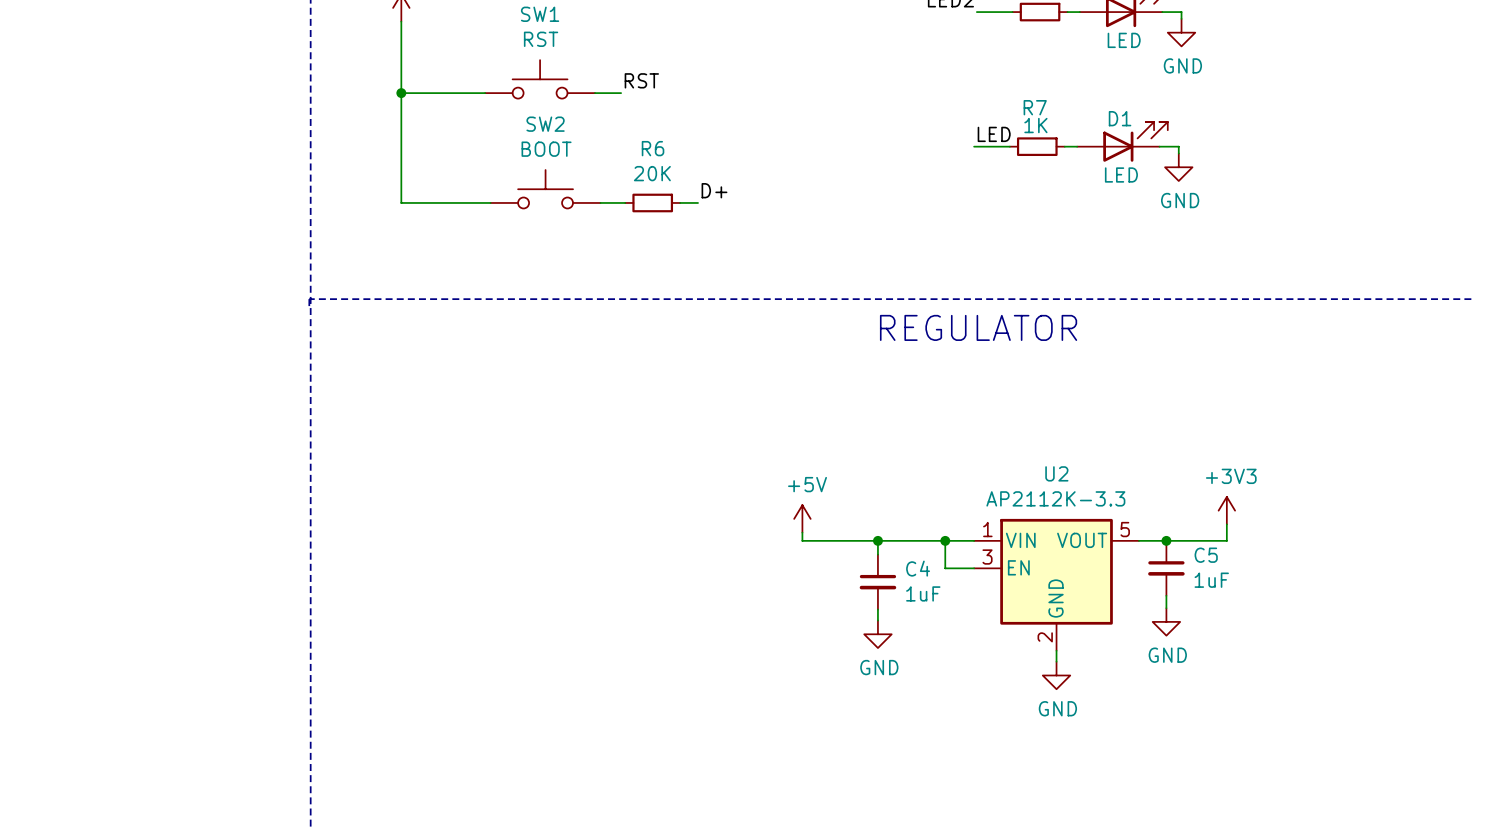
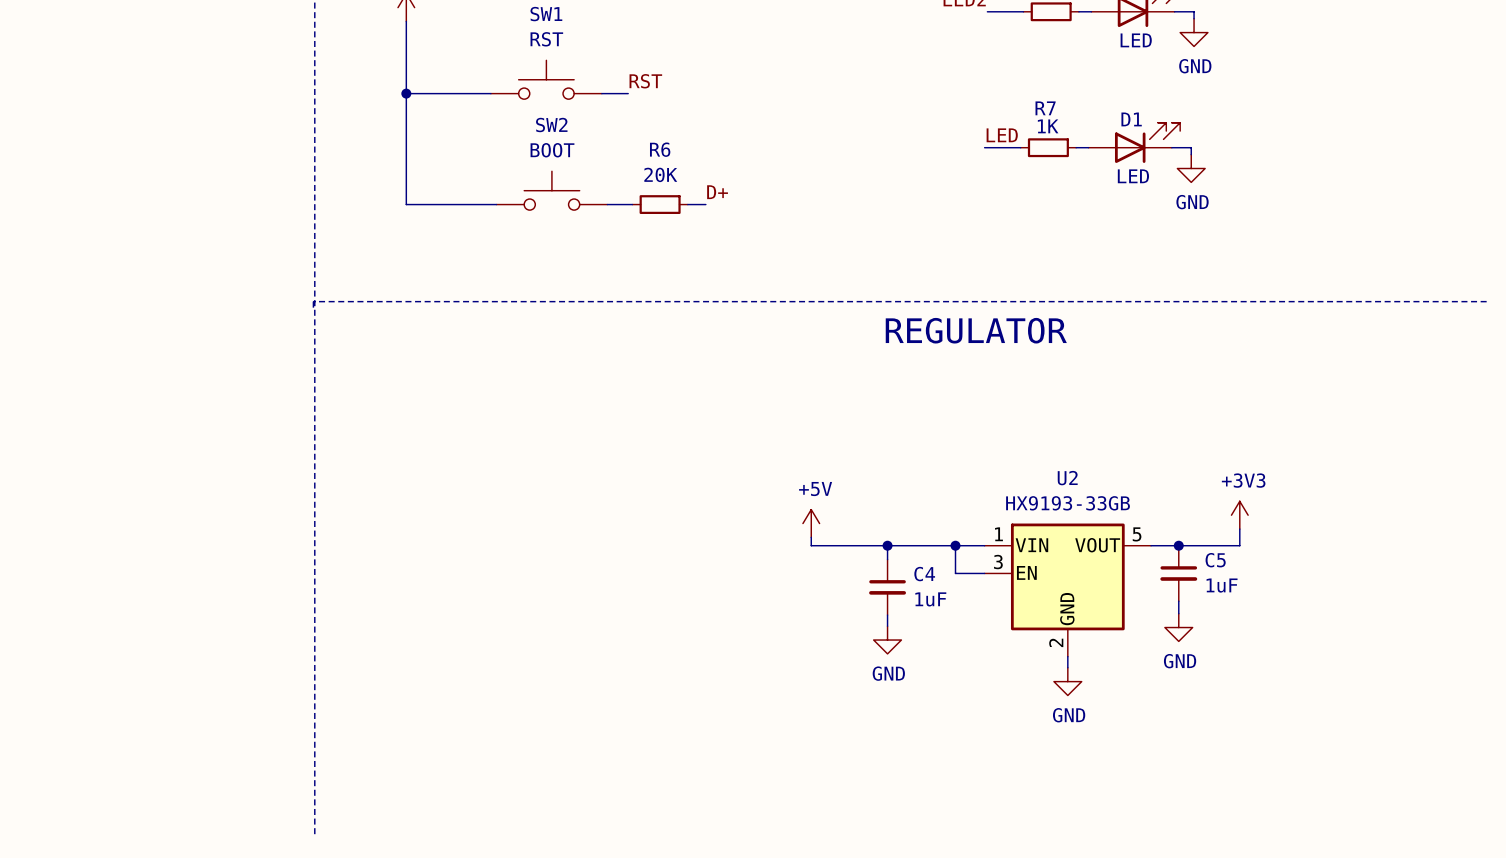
U2 value: AP2112K-3.3 (1055, 498) -> HX9193-33GB (1068, 503)

